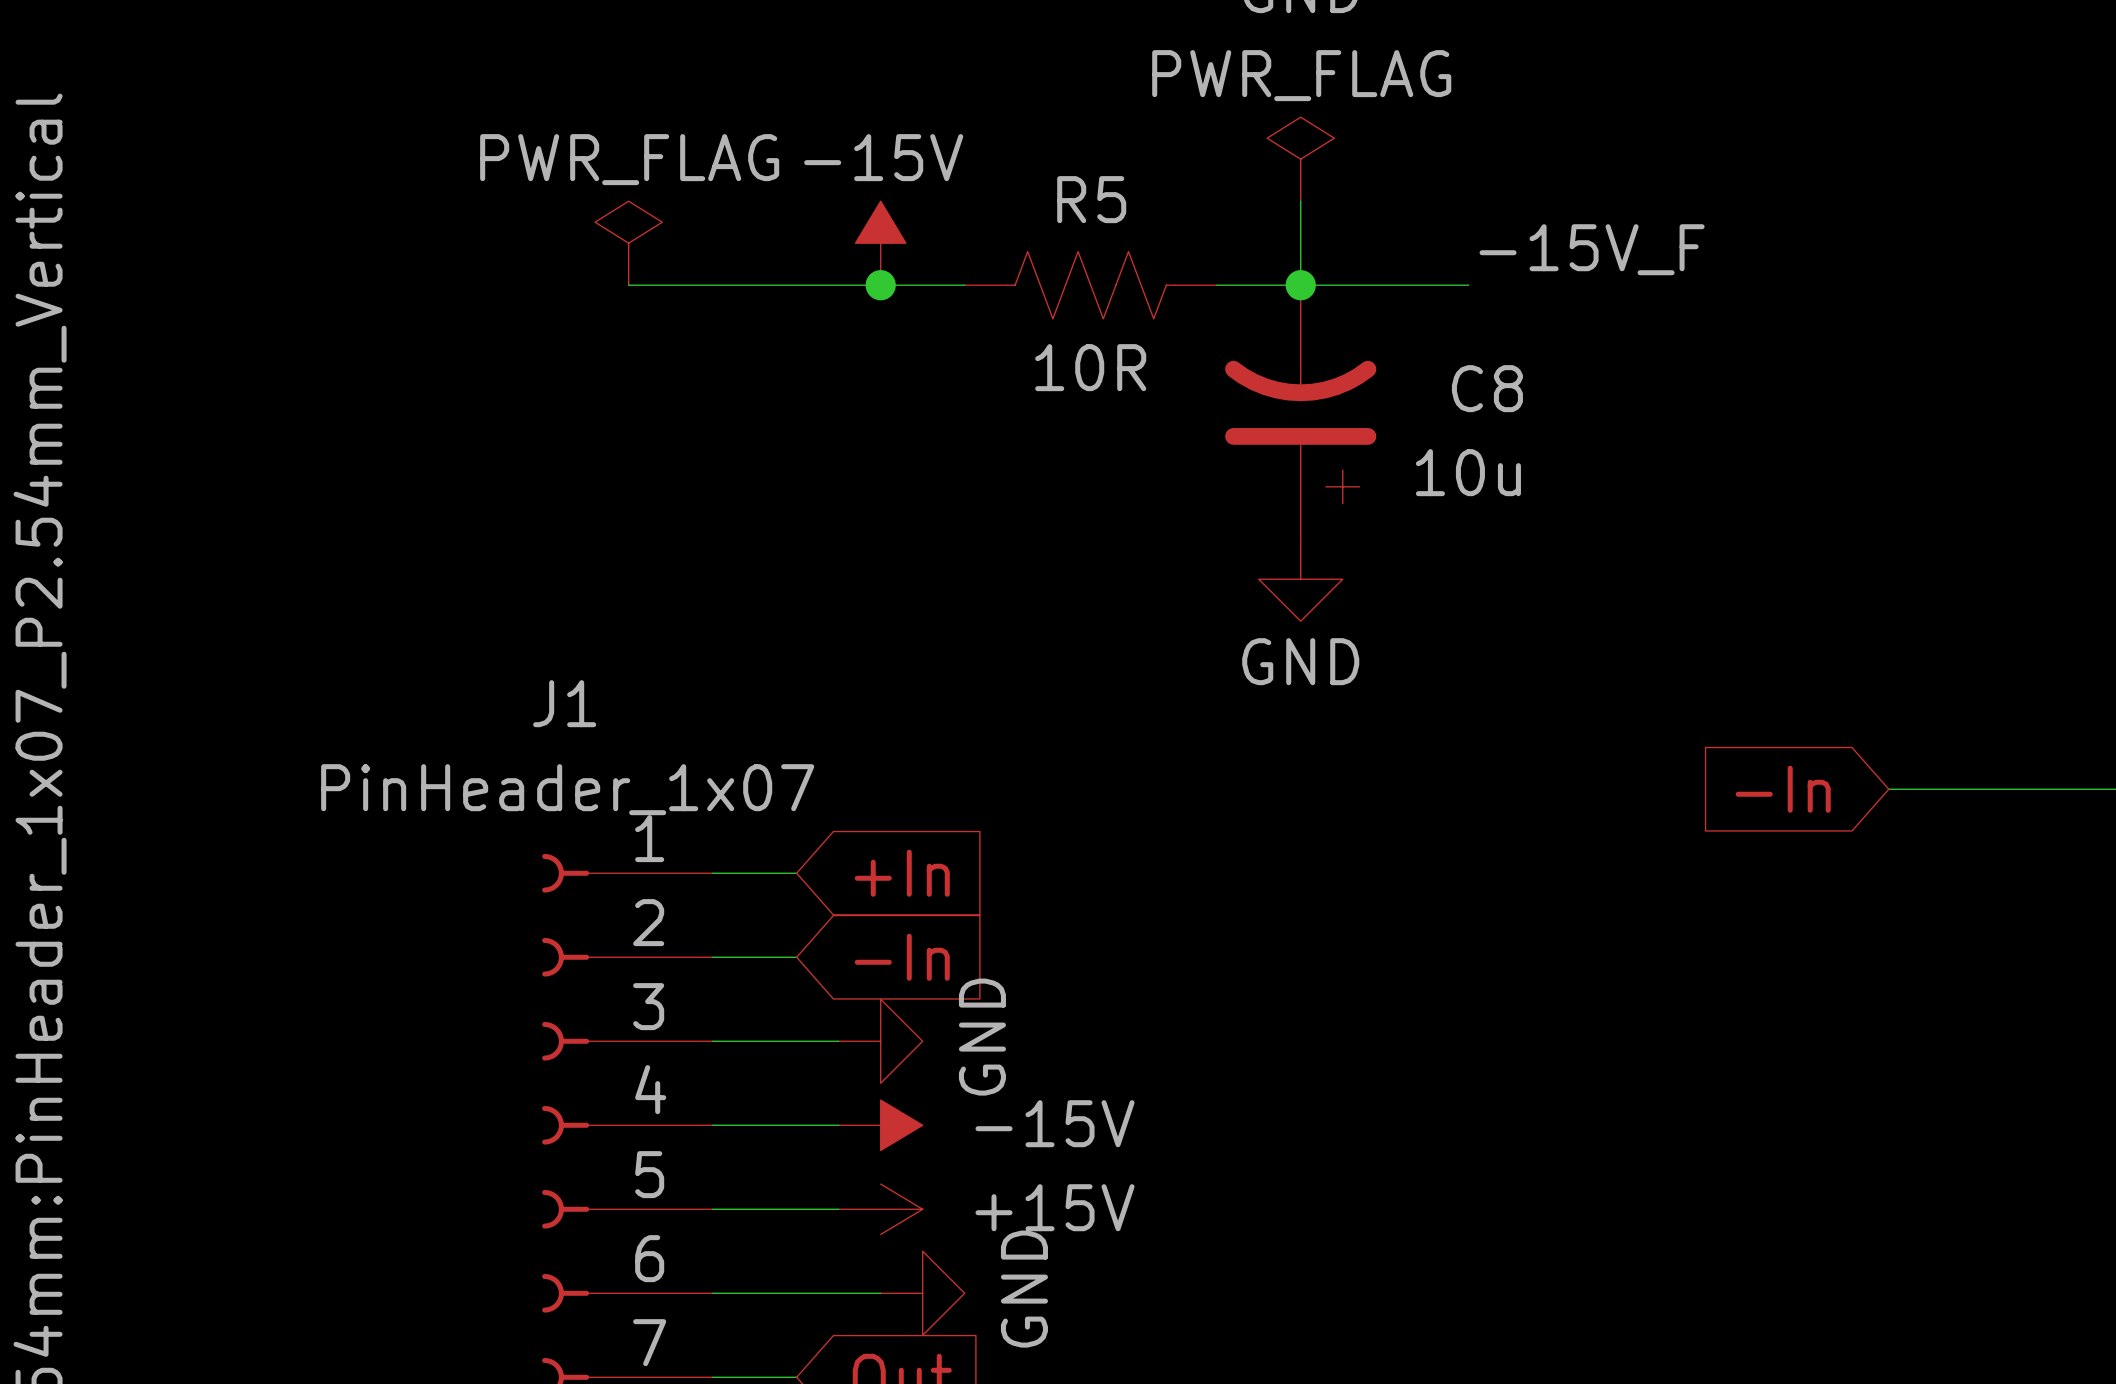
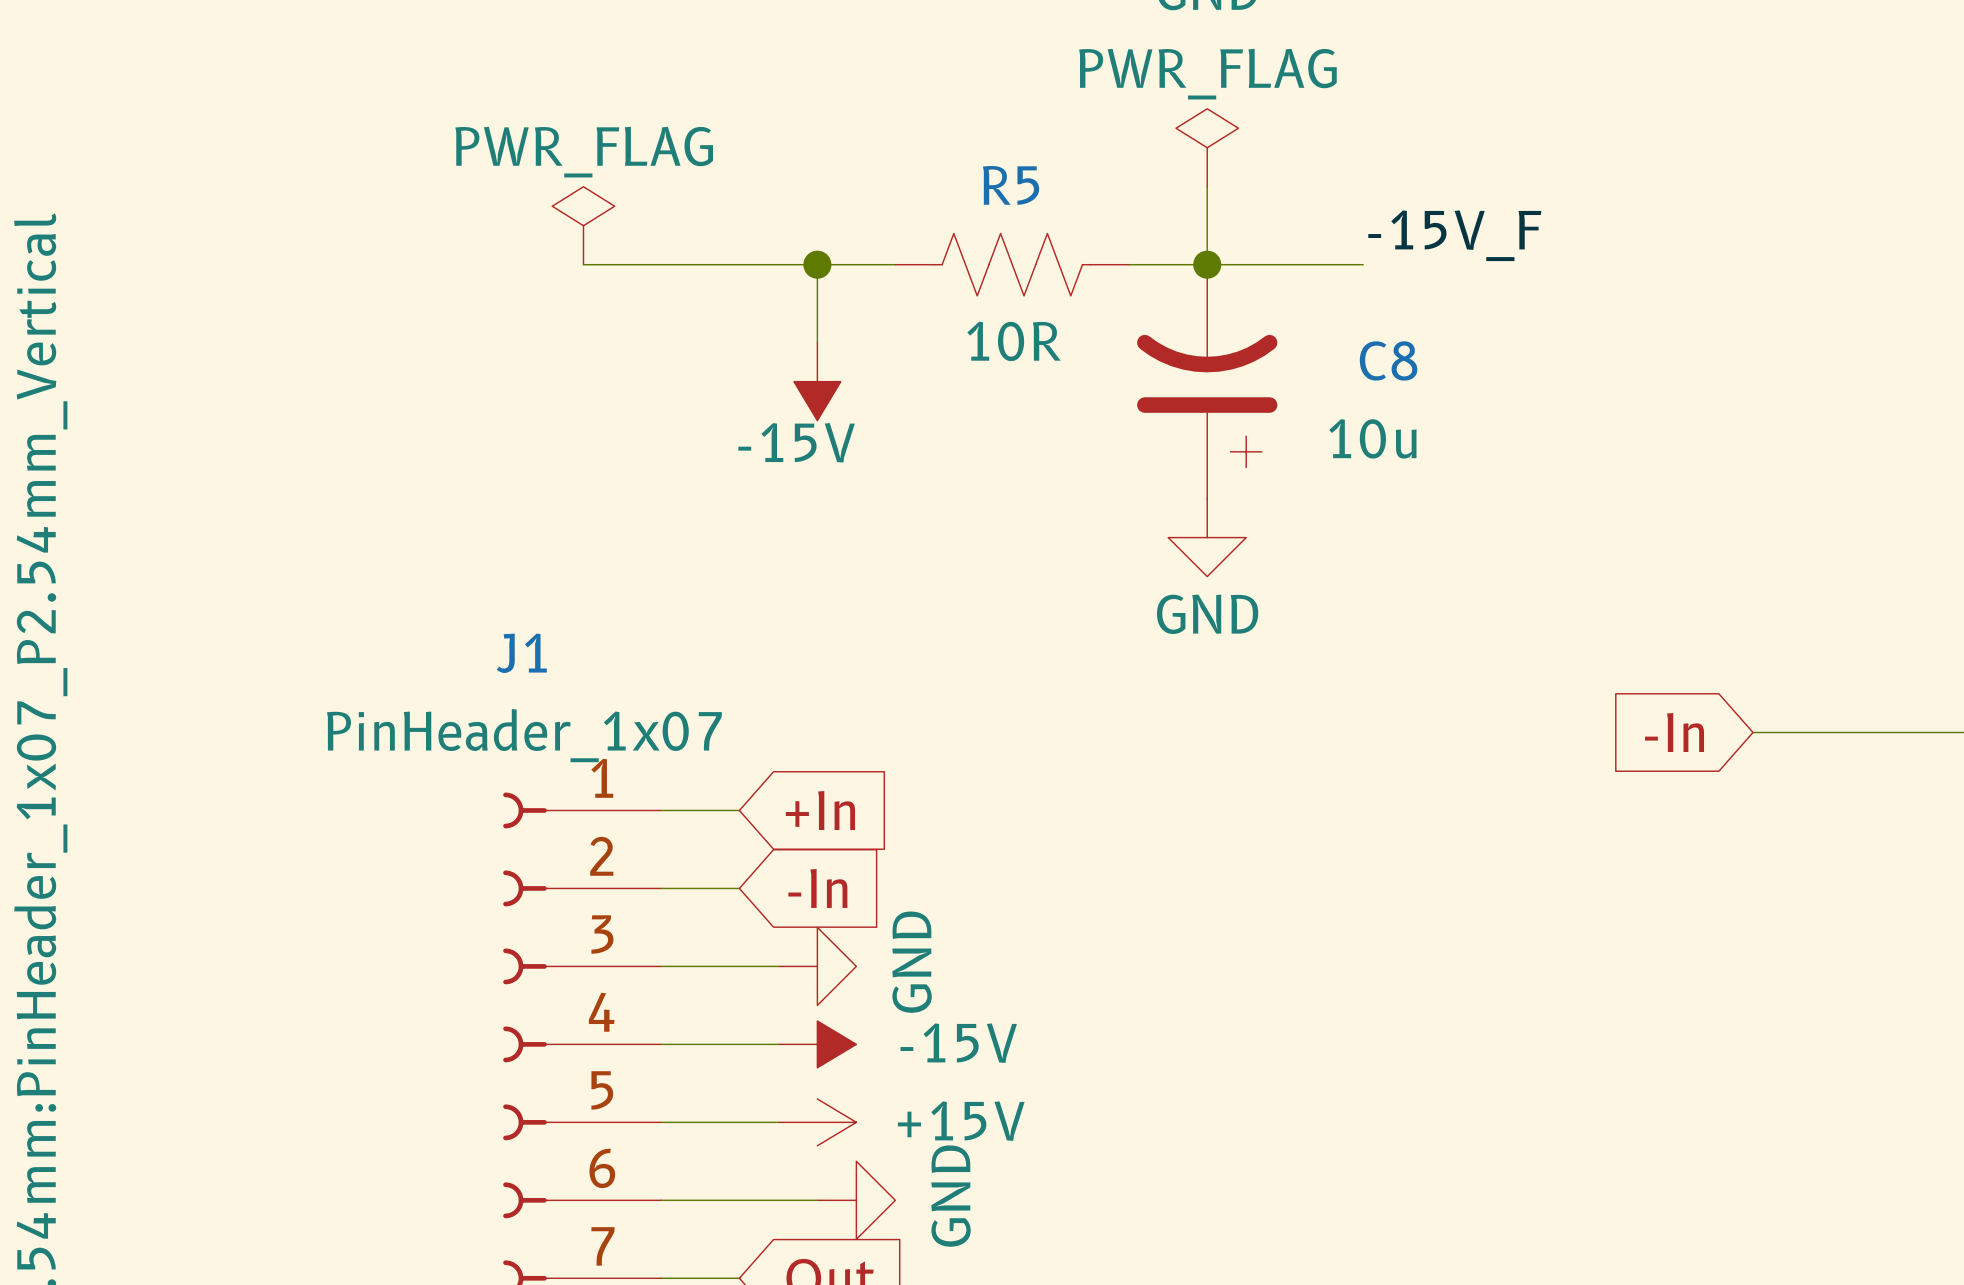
power symbol rotation: 0° (880, 243) -> 180° (817, 381)
power symbol position: -15V (880, 243) -> -15V (817, 381)
wire: none -> (817, 264) (817, 342)

